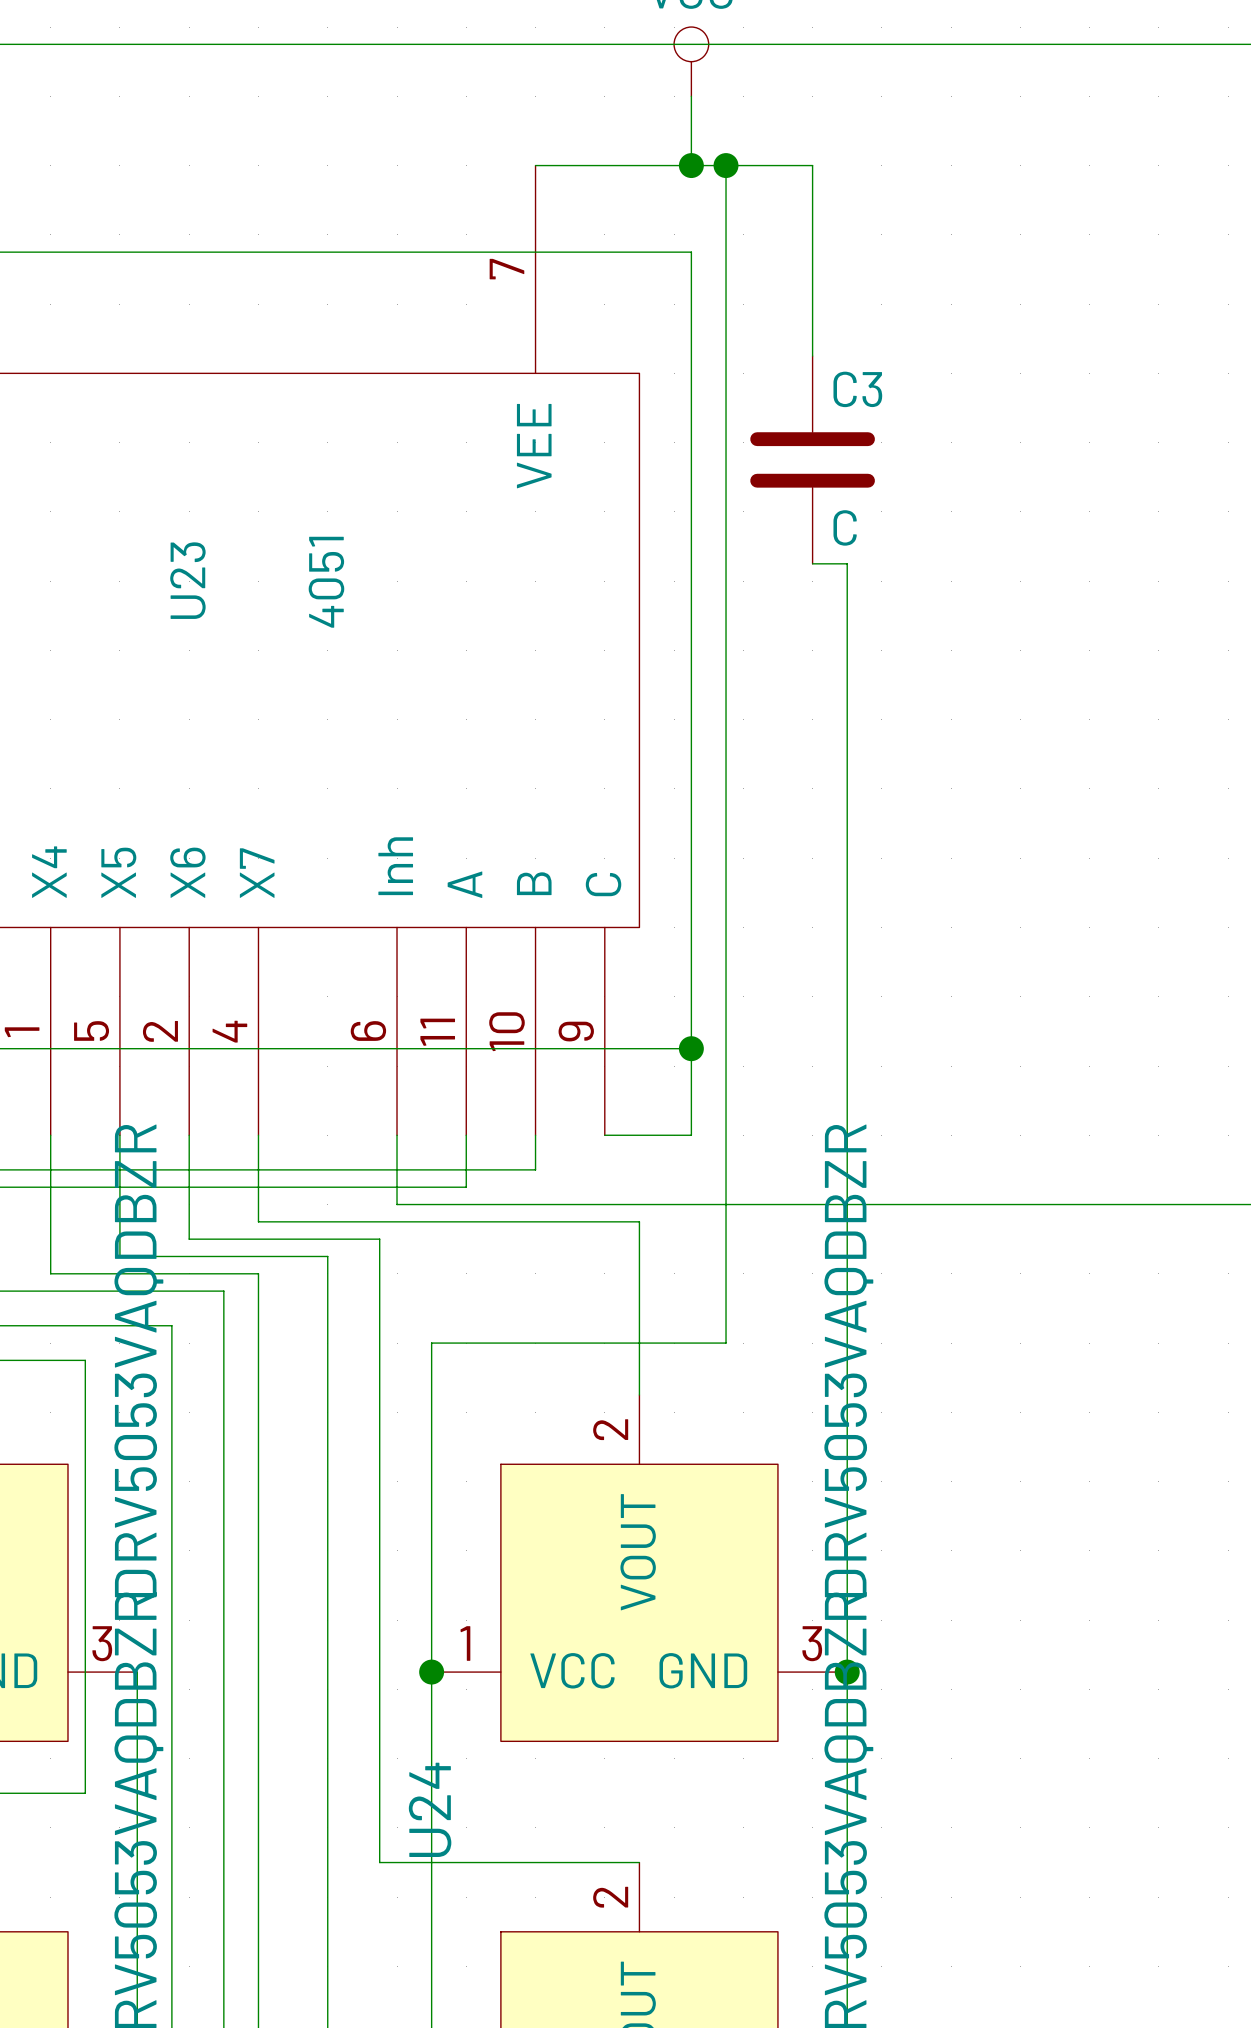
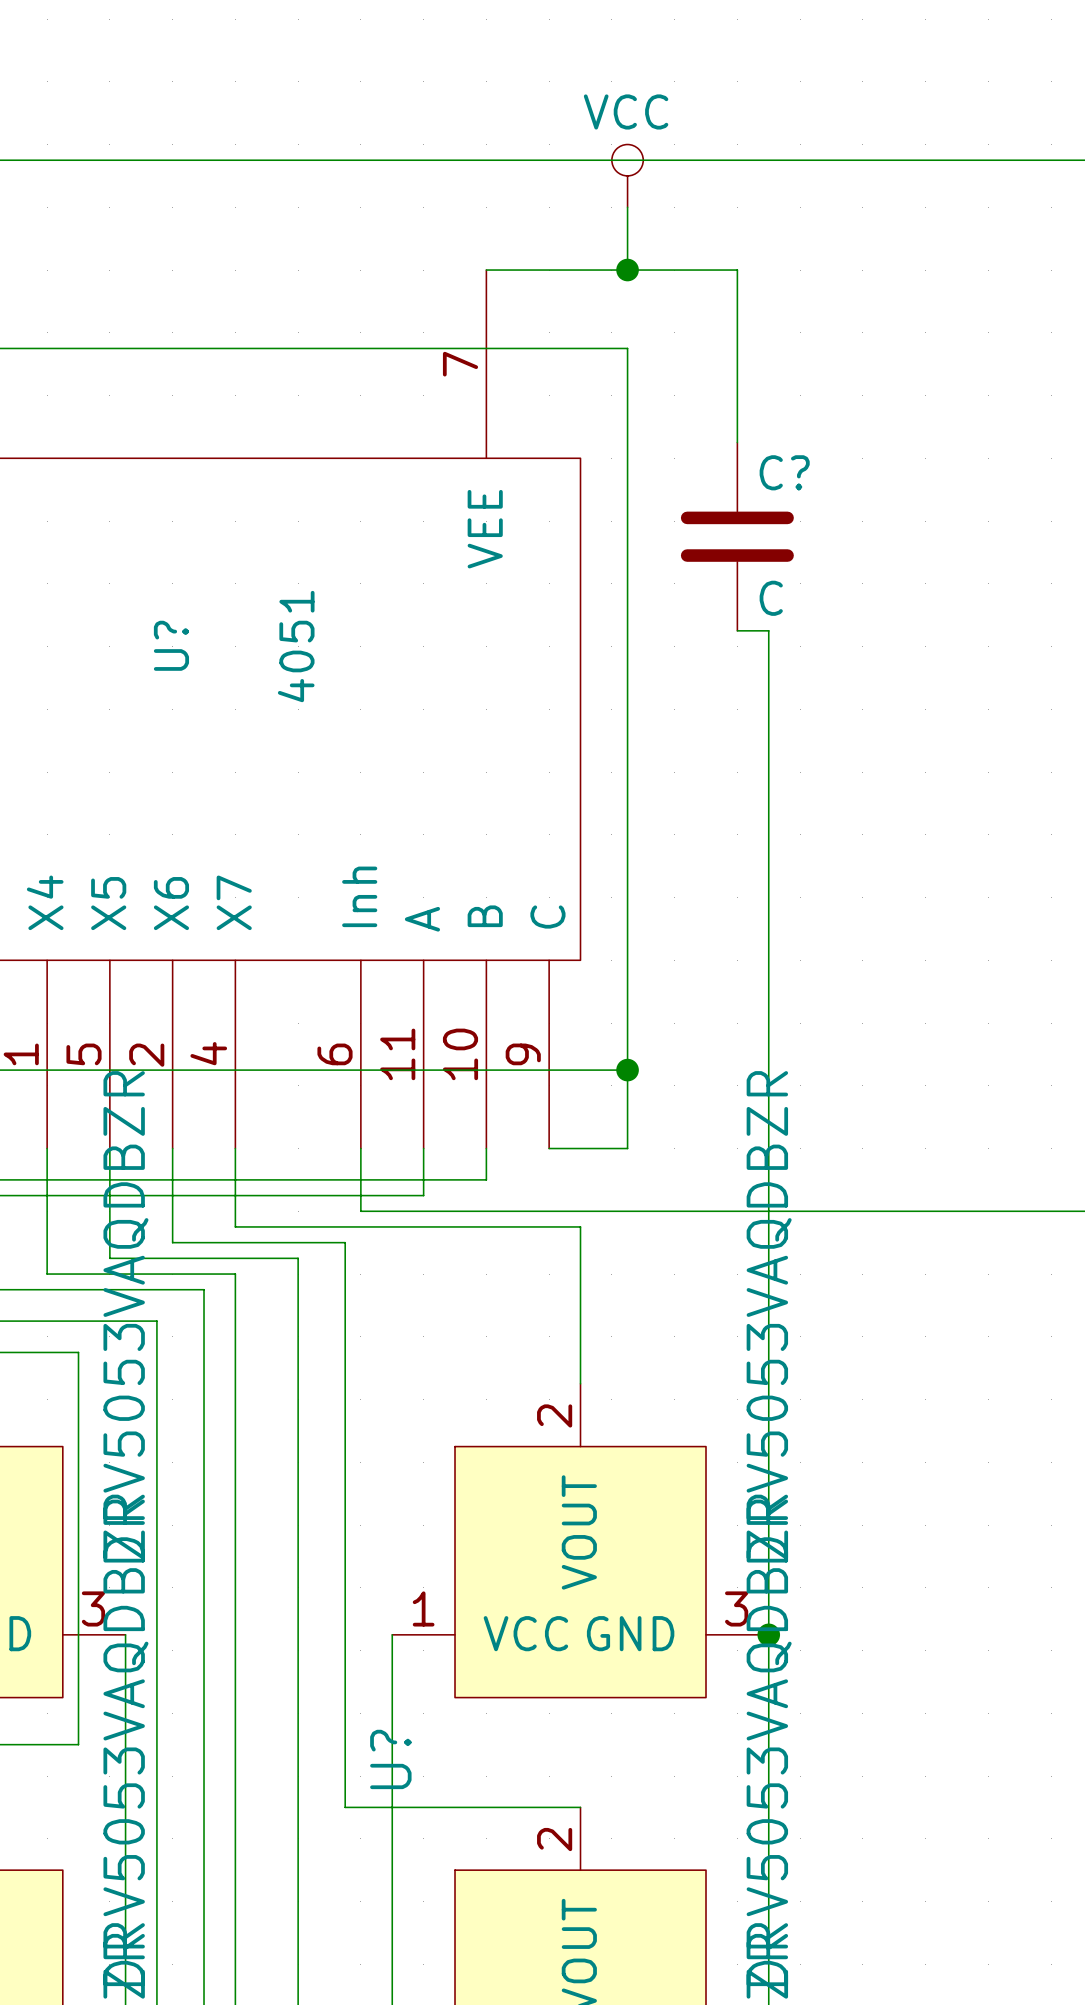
wire: (726, 165) (726, 1343) (431, 1343) (431, 1672) -> none
junction: (726, 165) -> none
C3 name: C3 (857, 389) -> C? (784, 472)
U23 name: U23 (187, 580) -> U? (171, 645)
junction: (431, 1672) -> none
U24 name: U24 (430, 1809) -> U? (390, 1759)

